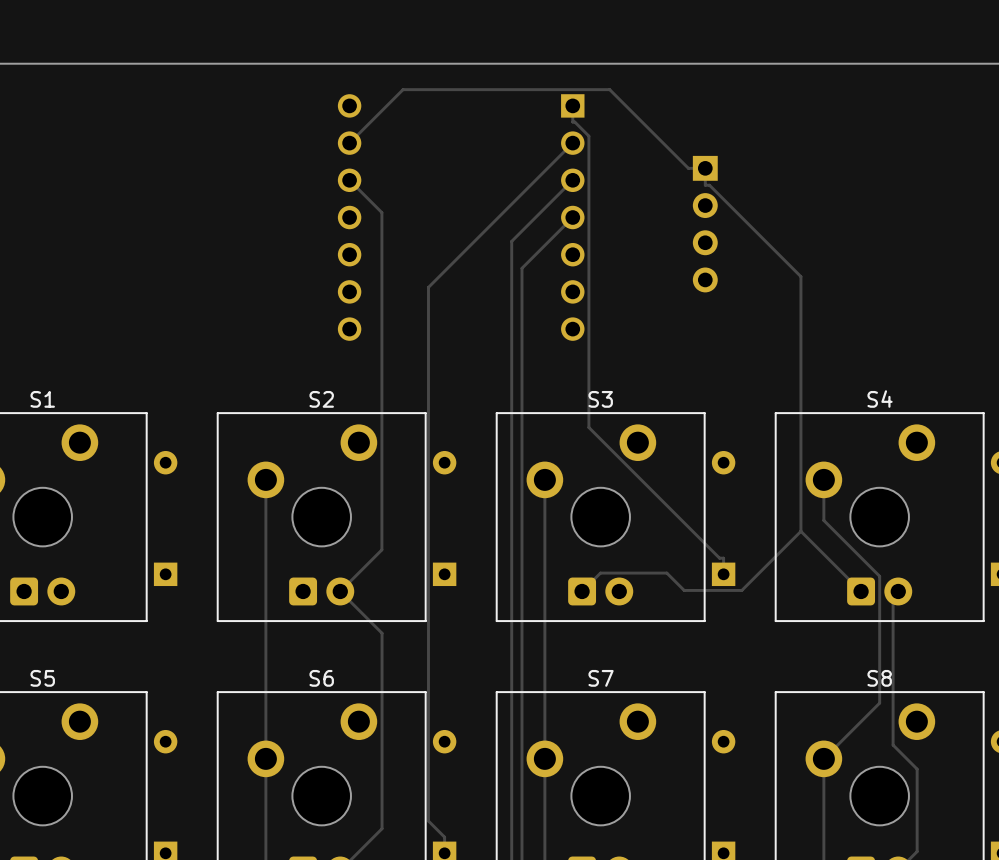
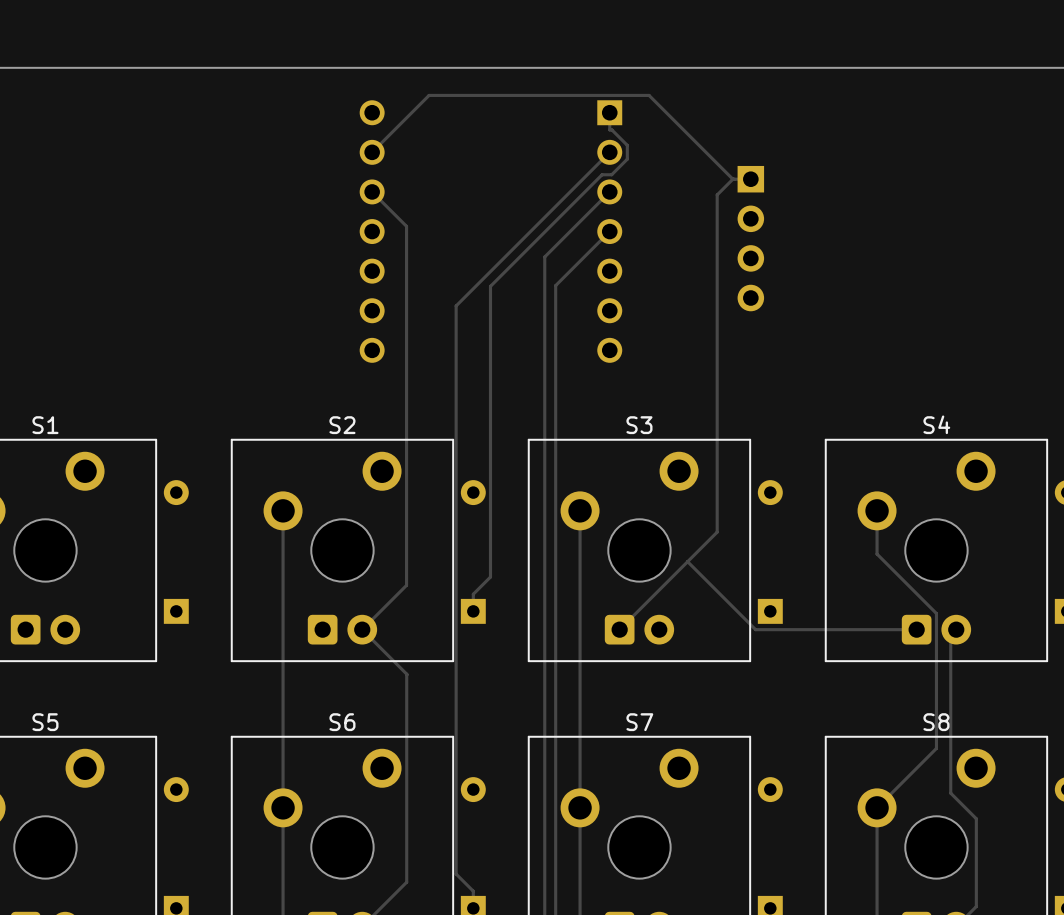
track: (574, 122) (588, 136) (588, 427) (719, 558) (723, 558) (723, 574) -> (611, 129) (627, 145) (627, 159) (611, 174) (602, 174) (490, 286) (490, 577) (473, 594) (473, 611)
track: (705, 168) (705, 185) (709, 185) (800, 276) (800, 531) -> none
track: (800, 531) (861, 591) -> (687, 561) (755, 629) (916, 629)
track: (800, 531) (741, 590) (684, 590) (666, 573) (600, 573) -> (732, 179) (717, 194) (717, 532) (639, 610)

